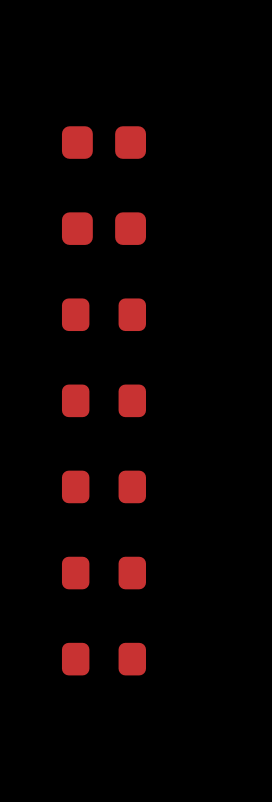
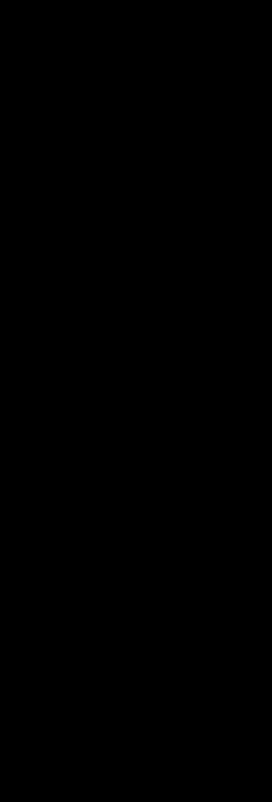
part: (103, 142) -> none
part: (103, 228) -> none
part: (103, 314) -> none
part: (103, 400) -> none
part: (103, 486) -> none
part: (103, 573) -> none
part: (103, 659) -> none

